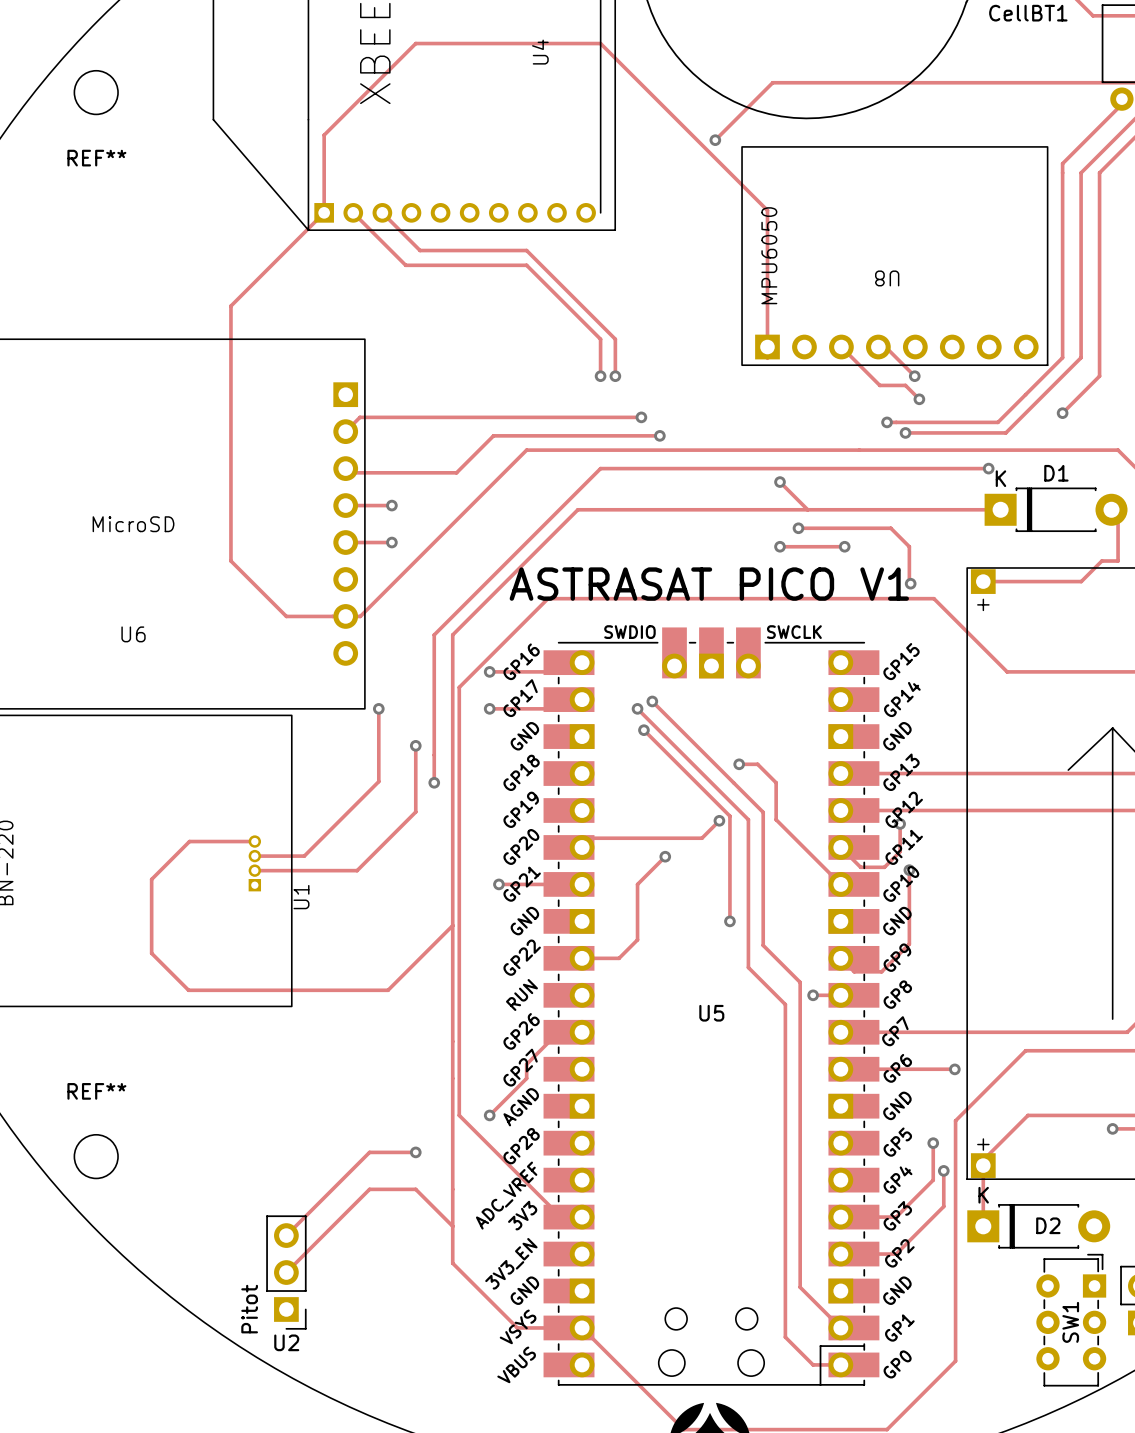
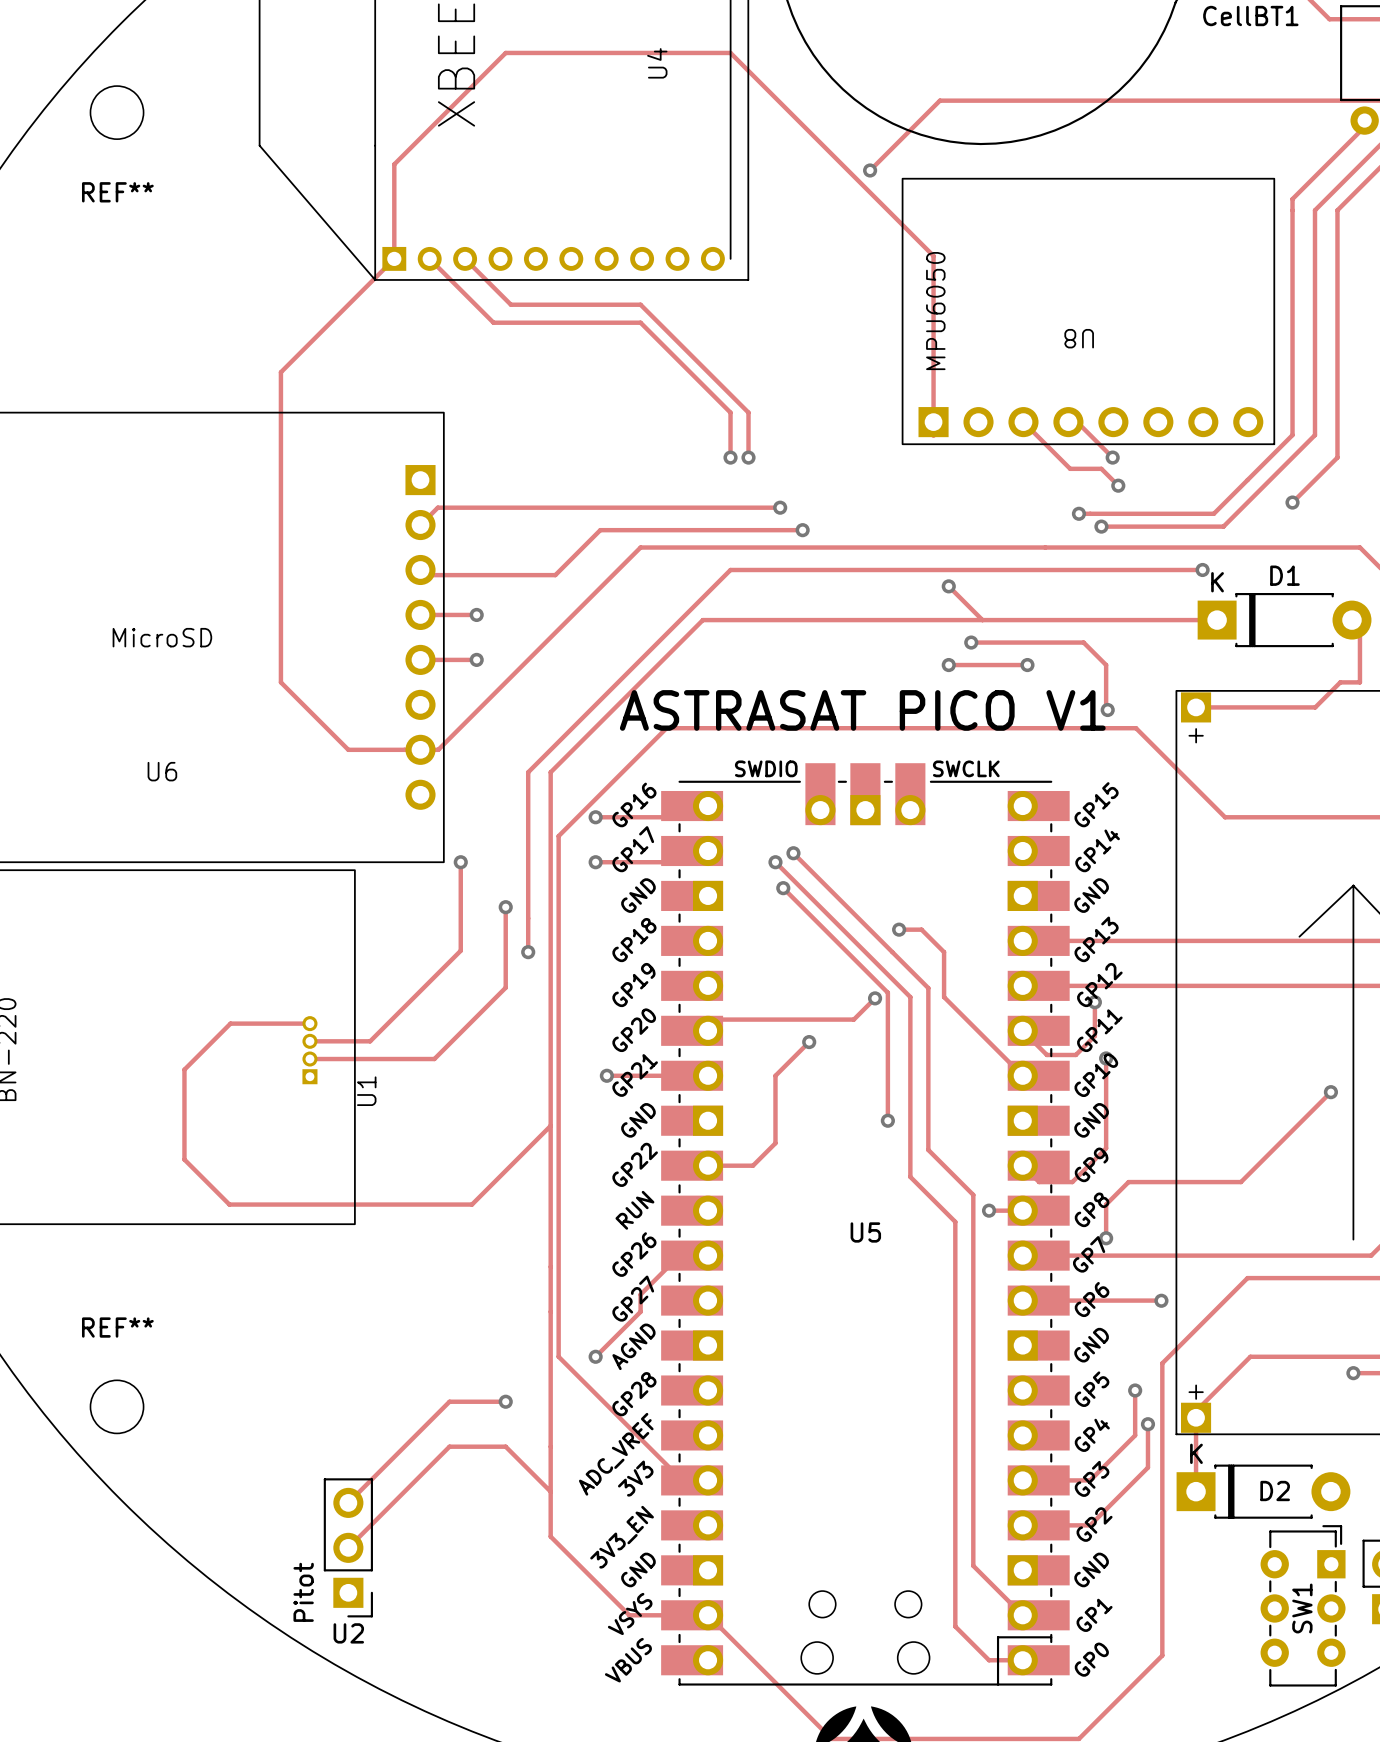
track: none -> (1330, 1092) (1241, 1182) (1128, 1182) (1106, 1204) (1106, 1238)
via: none -> (1330, 1092)
via: none -> (1106, 1238)

